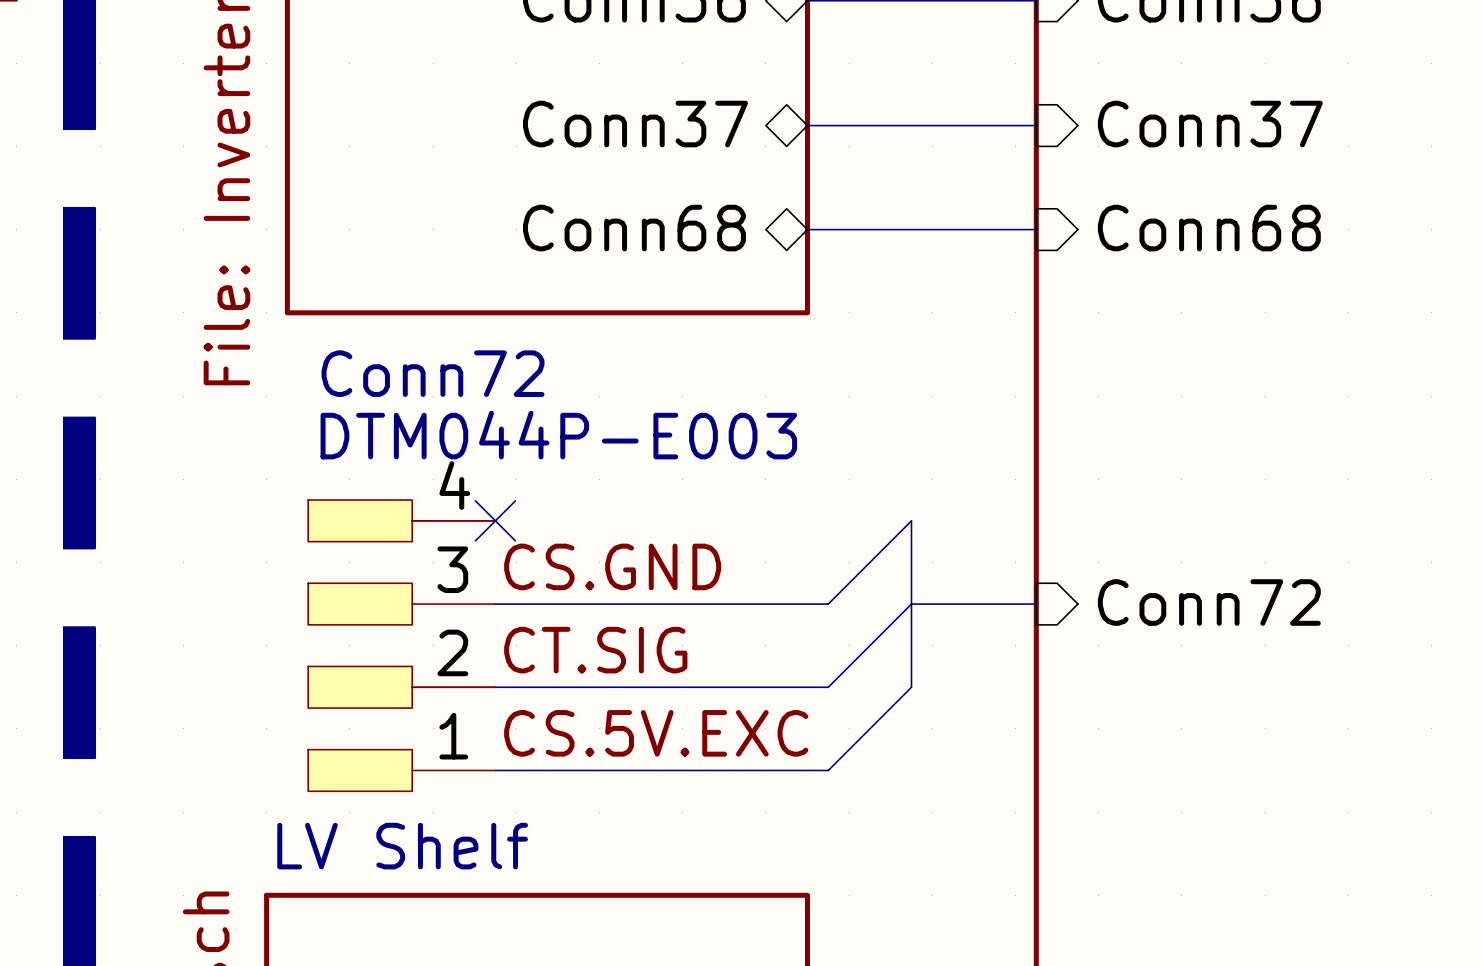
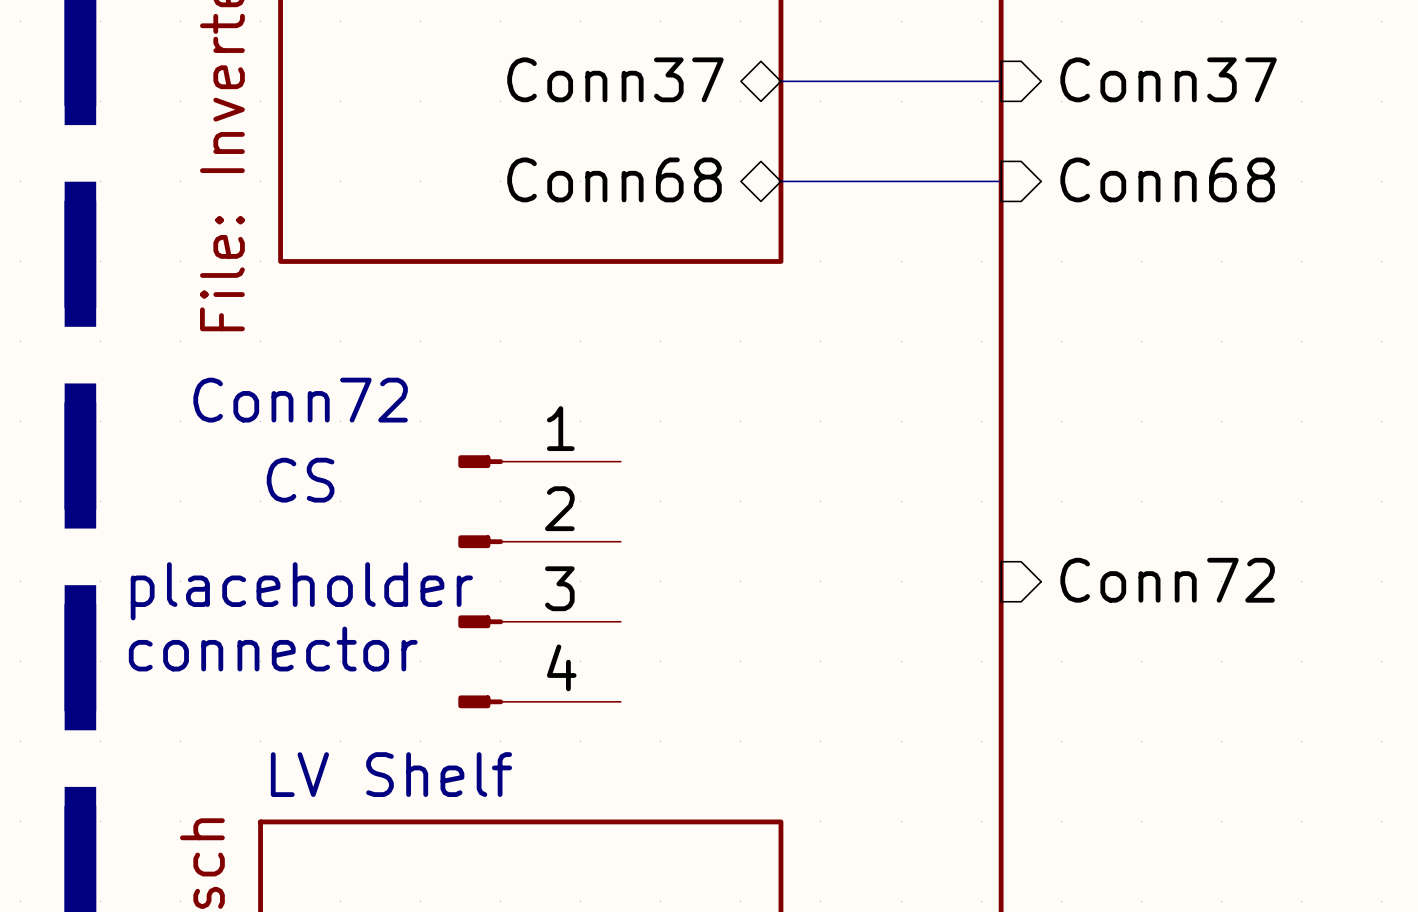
Conn72 name position: Conn72 (433, 373) -> Conn72 (300, 400)
Conn72 text: DTM044P-E003 (558, 435) -> none
Conn72 symbol: [308, 500, 496, 792] -> [458, 455, 621, 709]
no-connect mark: (495, 520) -> none
wire: (911, 520) (828, 604) (495, 604) -> none
bus: (911, 520) (911, 687) -> none
Conn72 value: none -> CS (300, 480)
label: CS.GND (612, 566) -> none
sheet pin position: Conn72 (1209, 602) -> Conn72 (1167, 580)
wire: (911, 604) (828, 687) (495, 687) -> none
bus: (911, 604) (1036, 604) -> none
label: CT.SIG (595, 650) -> none
text: none -> placeholder (301, 591)
wire: (911, 687) (828, 770) (495, 770) -> none
text: none -> connector (273, 649)
label: CS.5V.EXC (656, 733) -> none

